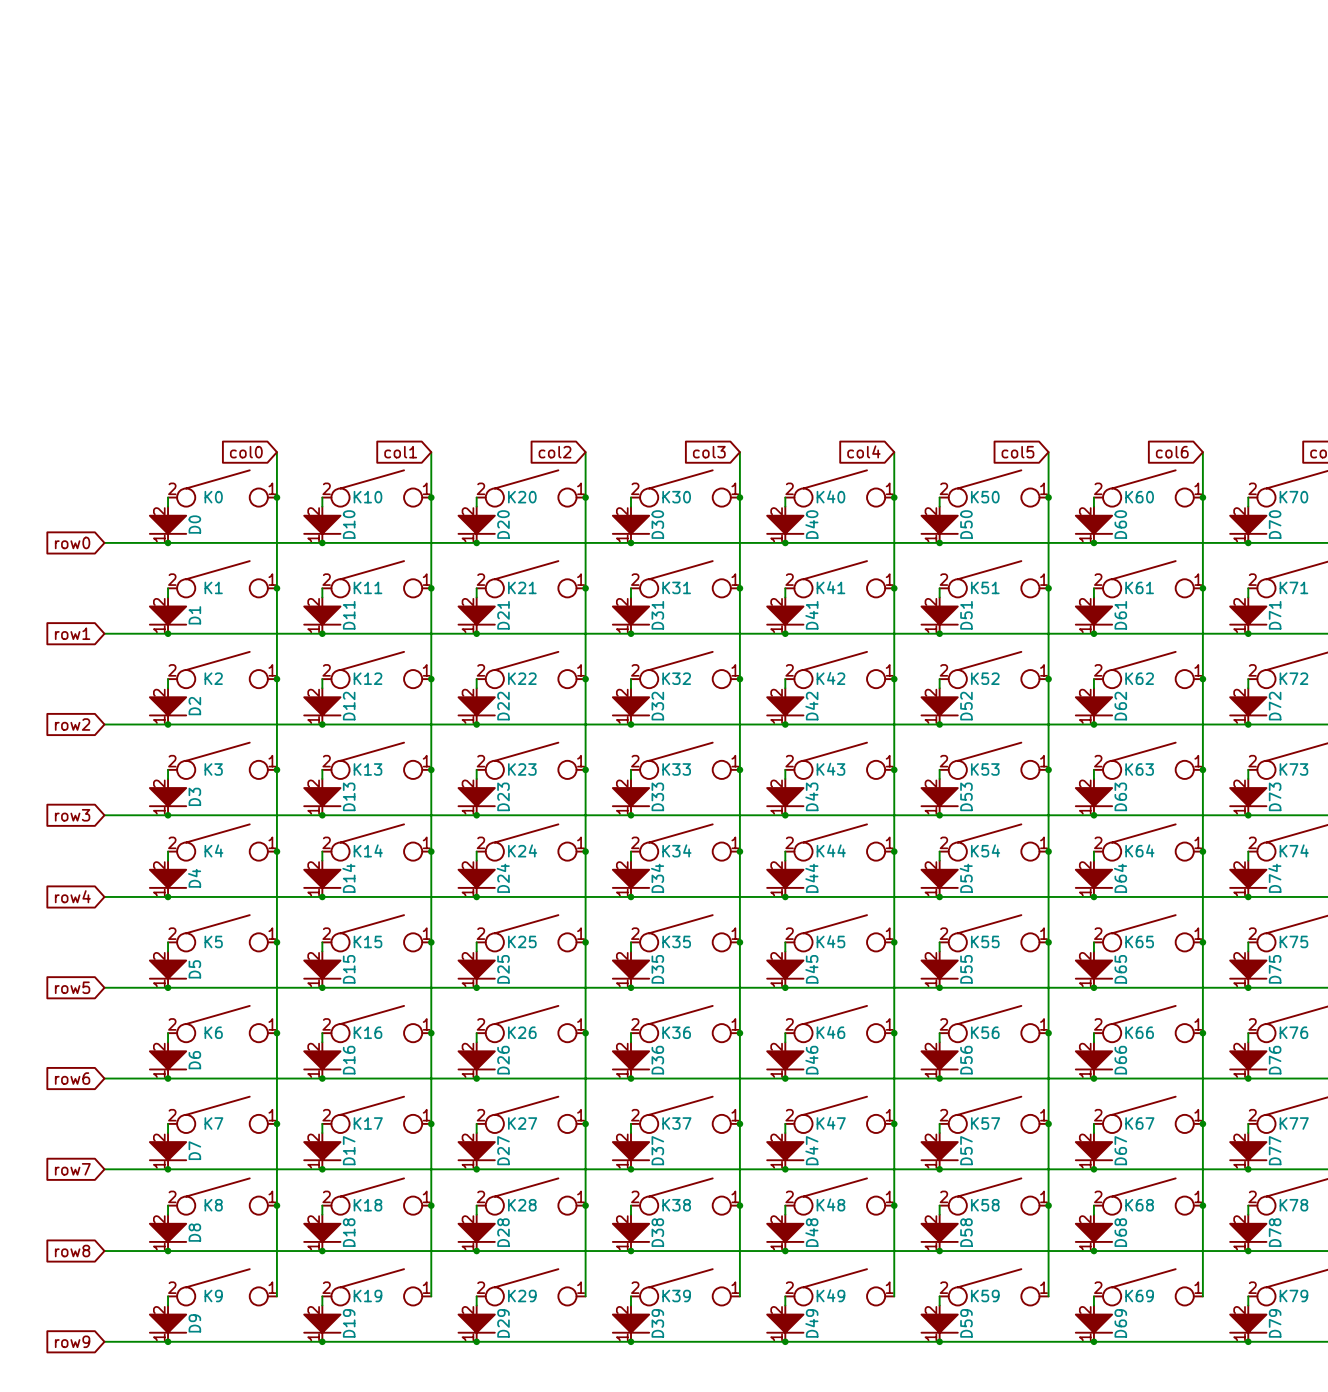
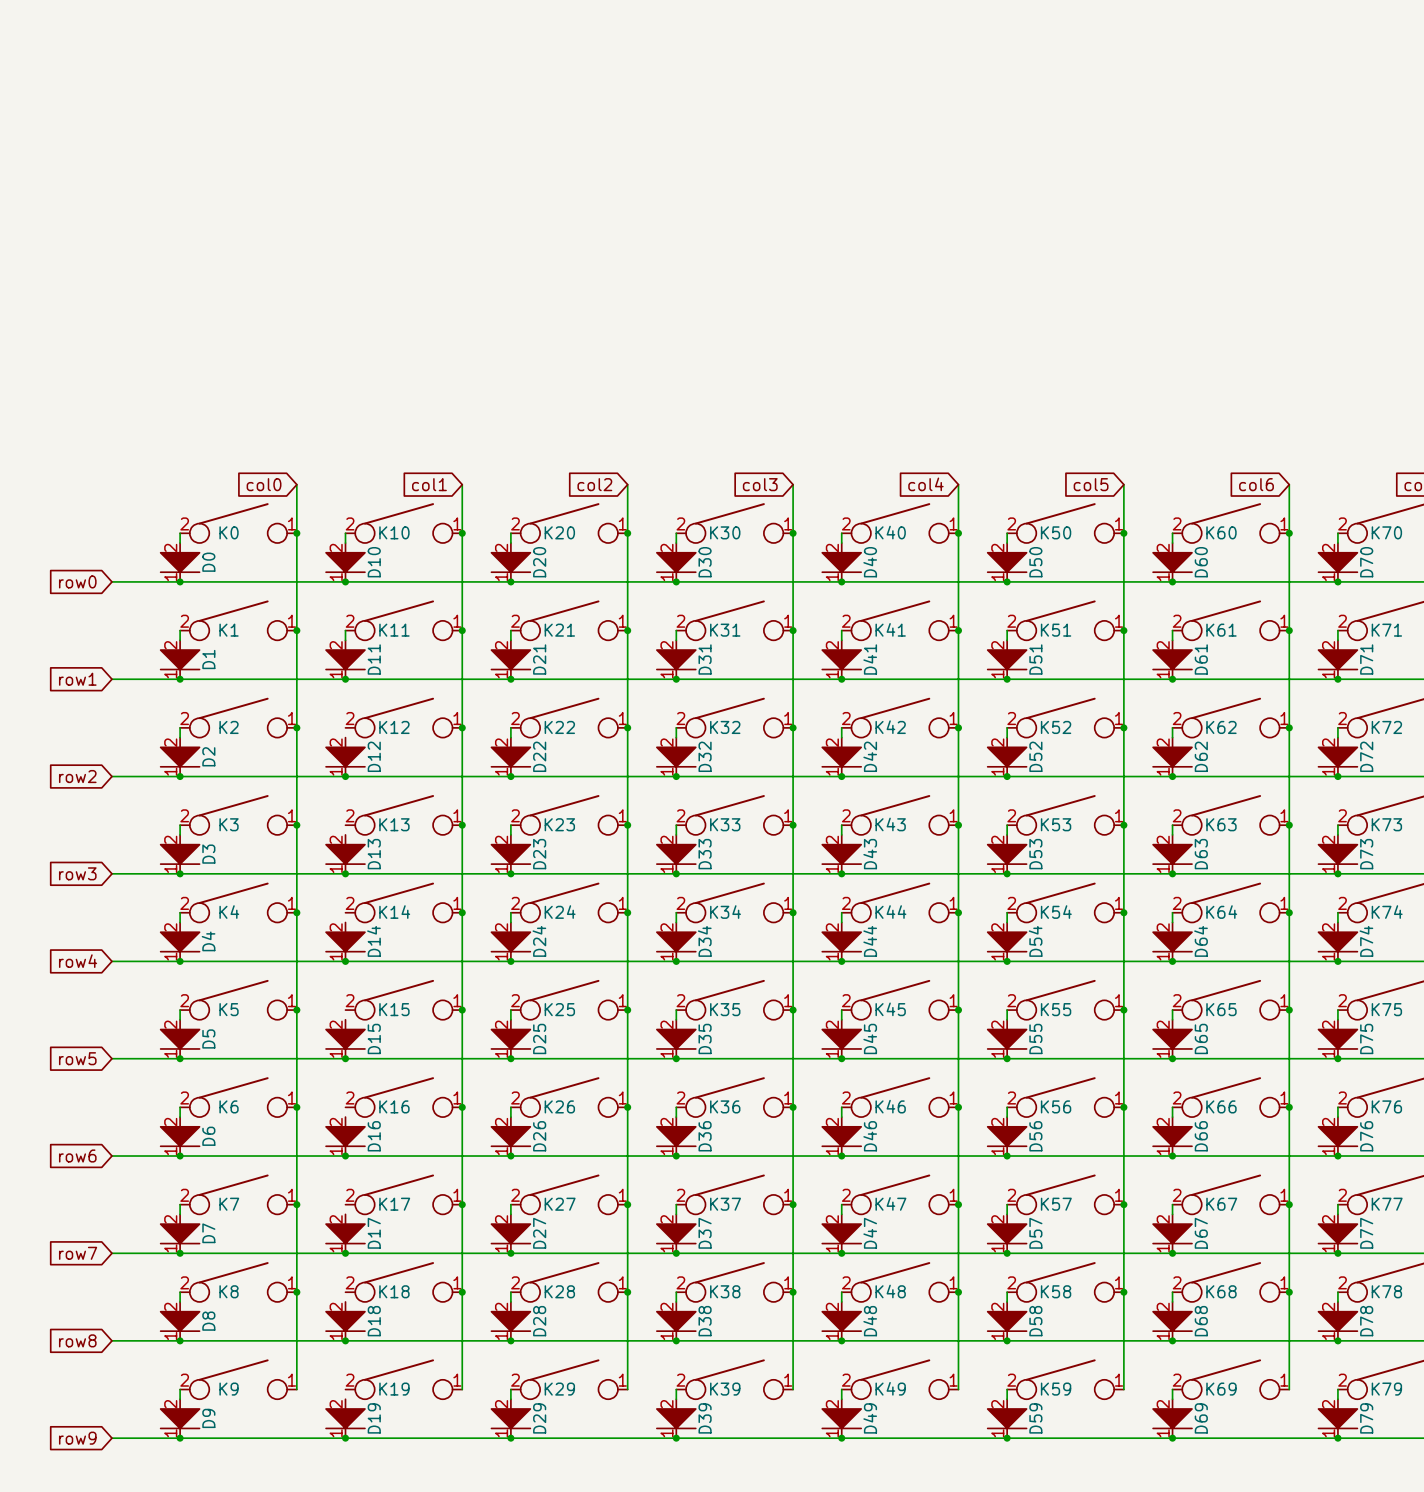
wire: (322, 679) (322, 688) -> none
wire: (322, 769) (322, 778) -> none
wire: (322, 851) (322, 860) -> none
wire: (322, 942) (322, 951) -> none
wire: (322, 1033) (322, 1042) -> none
wire: (322, 1123) (322, 1133) -> none
wire: (322, 1205) (322, 1214) -> none
wire: (322, 1296) (322, 1305) -> none

